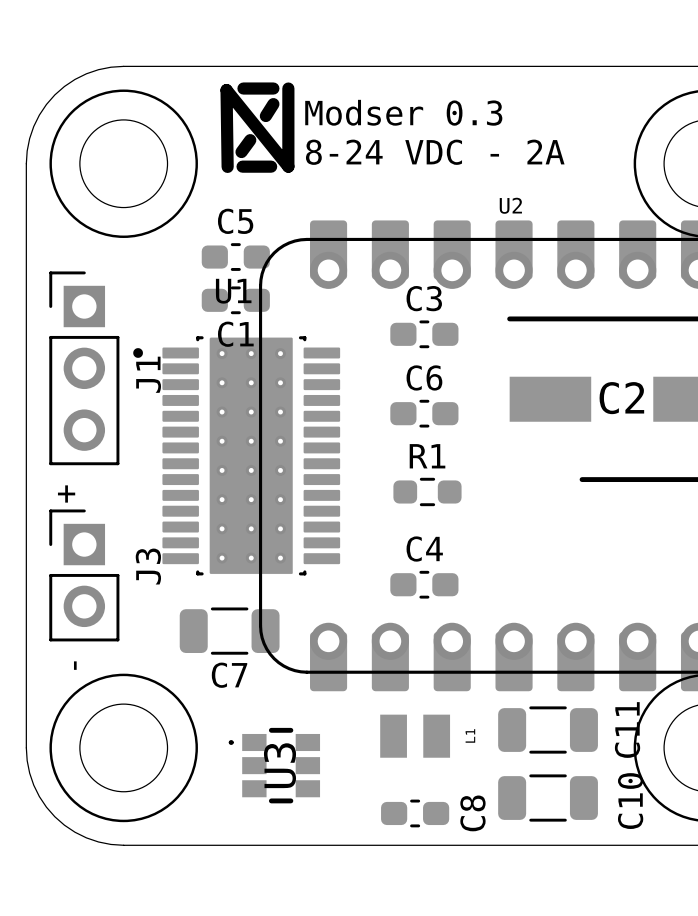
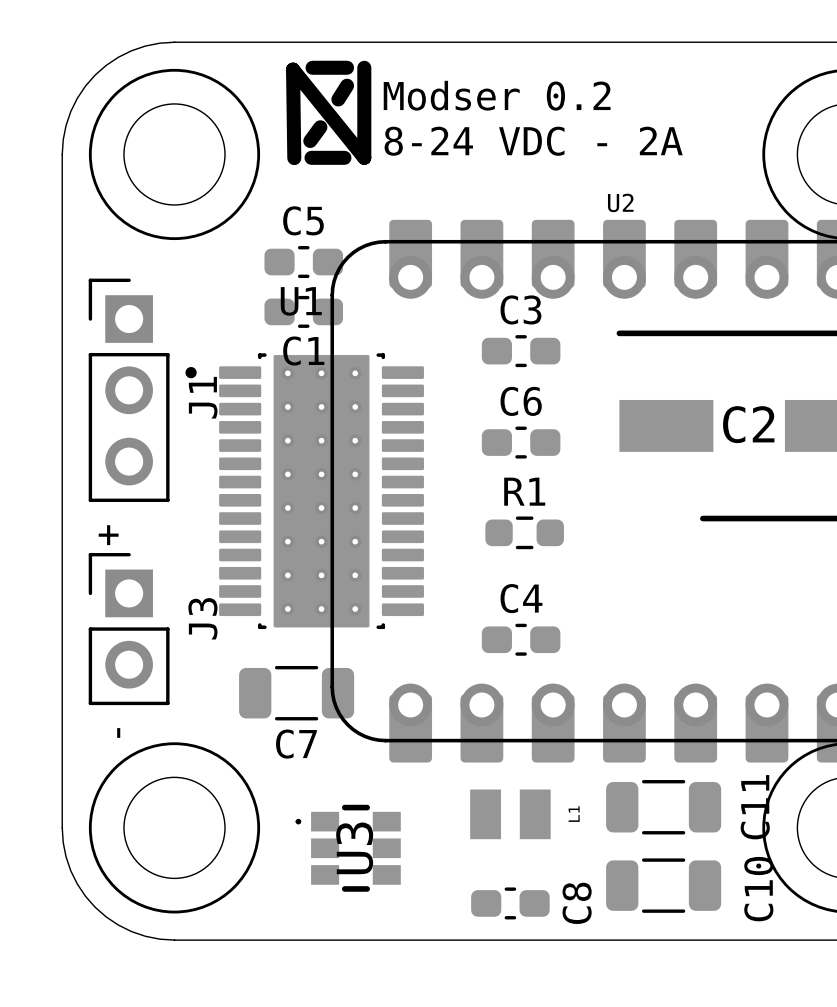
text: Modser 0.3 (403, 112) -> Modser 0.2 (497, 95)

